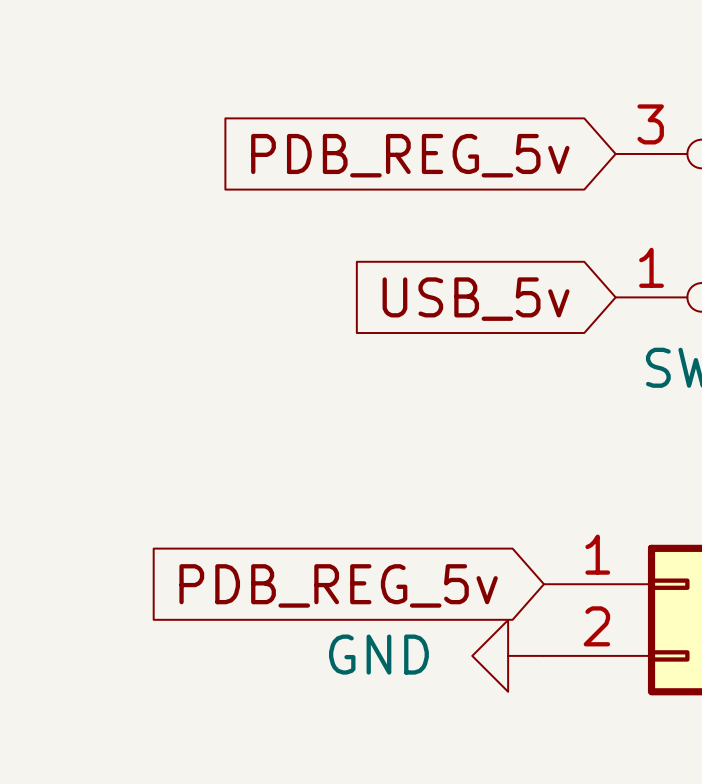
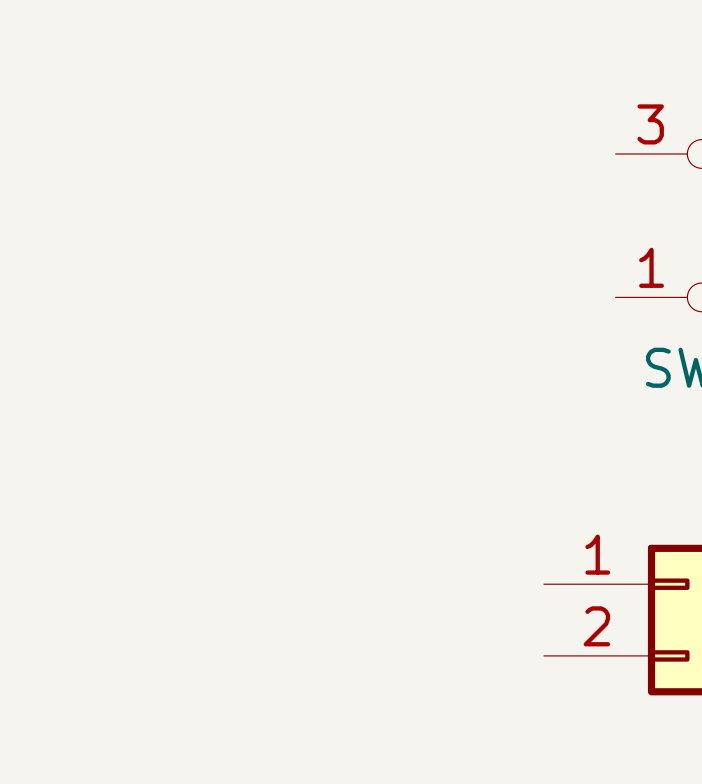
global label: PDB_REG_5v (410, 155) -> none
global label: USB_5v (476, 299) -> none
global label: PDB_REG_5v (338, 585) -> none
power symbol: GND (508, 655) -> none

